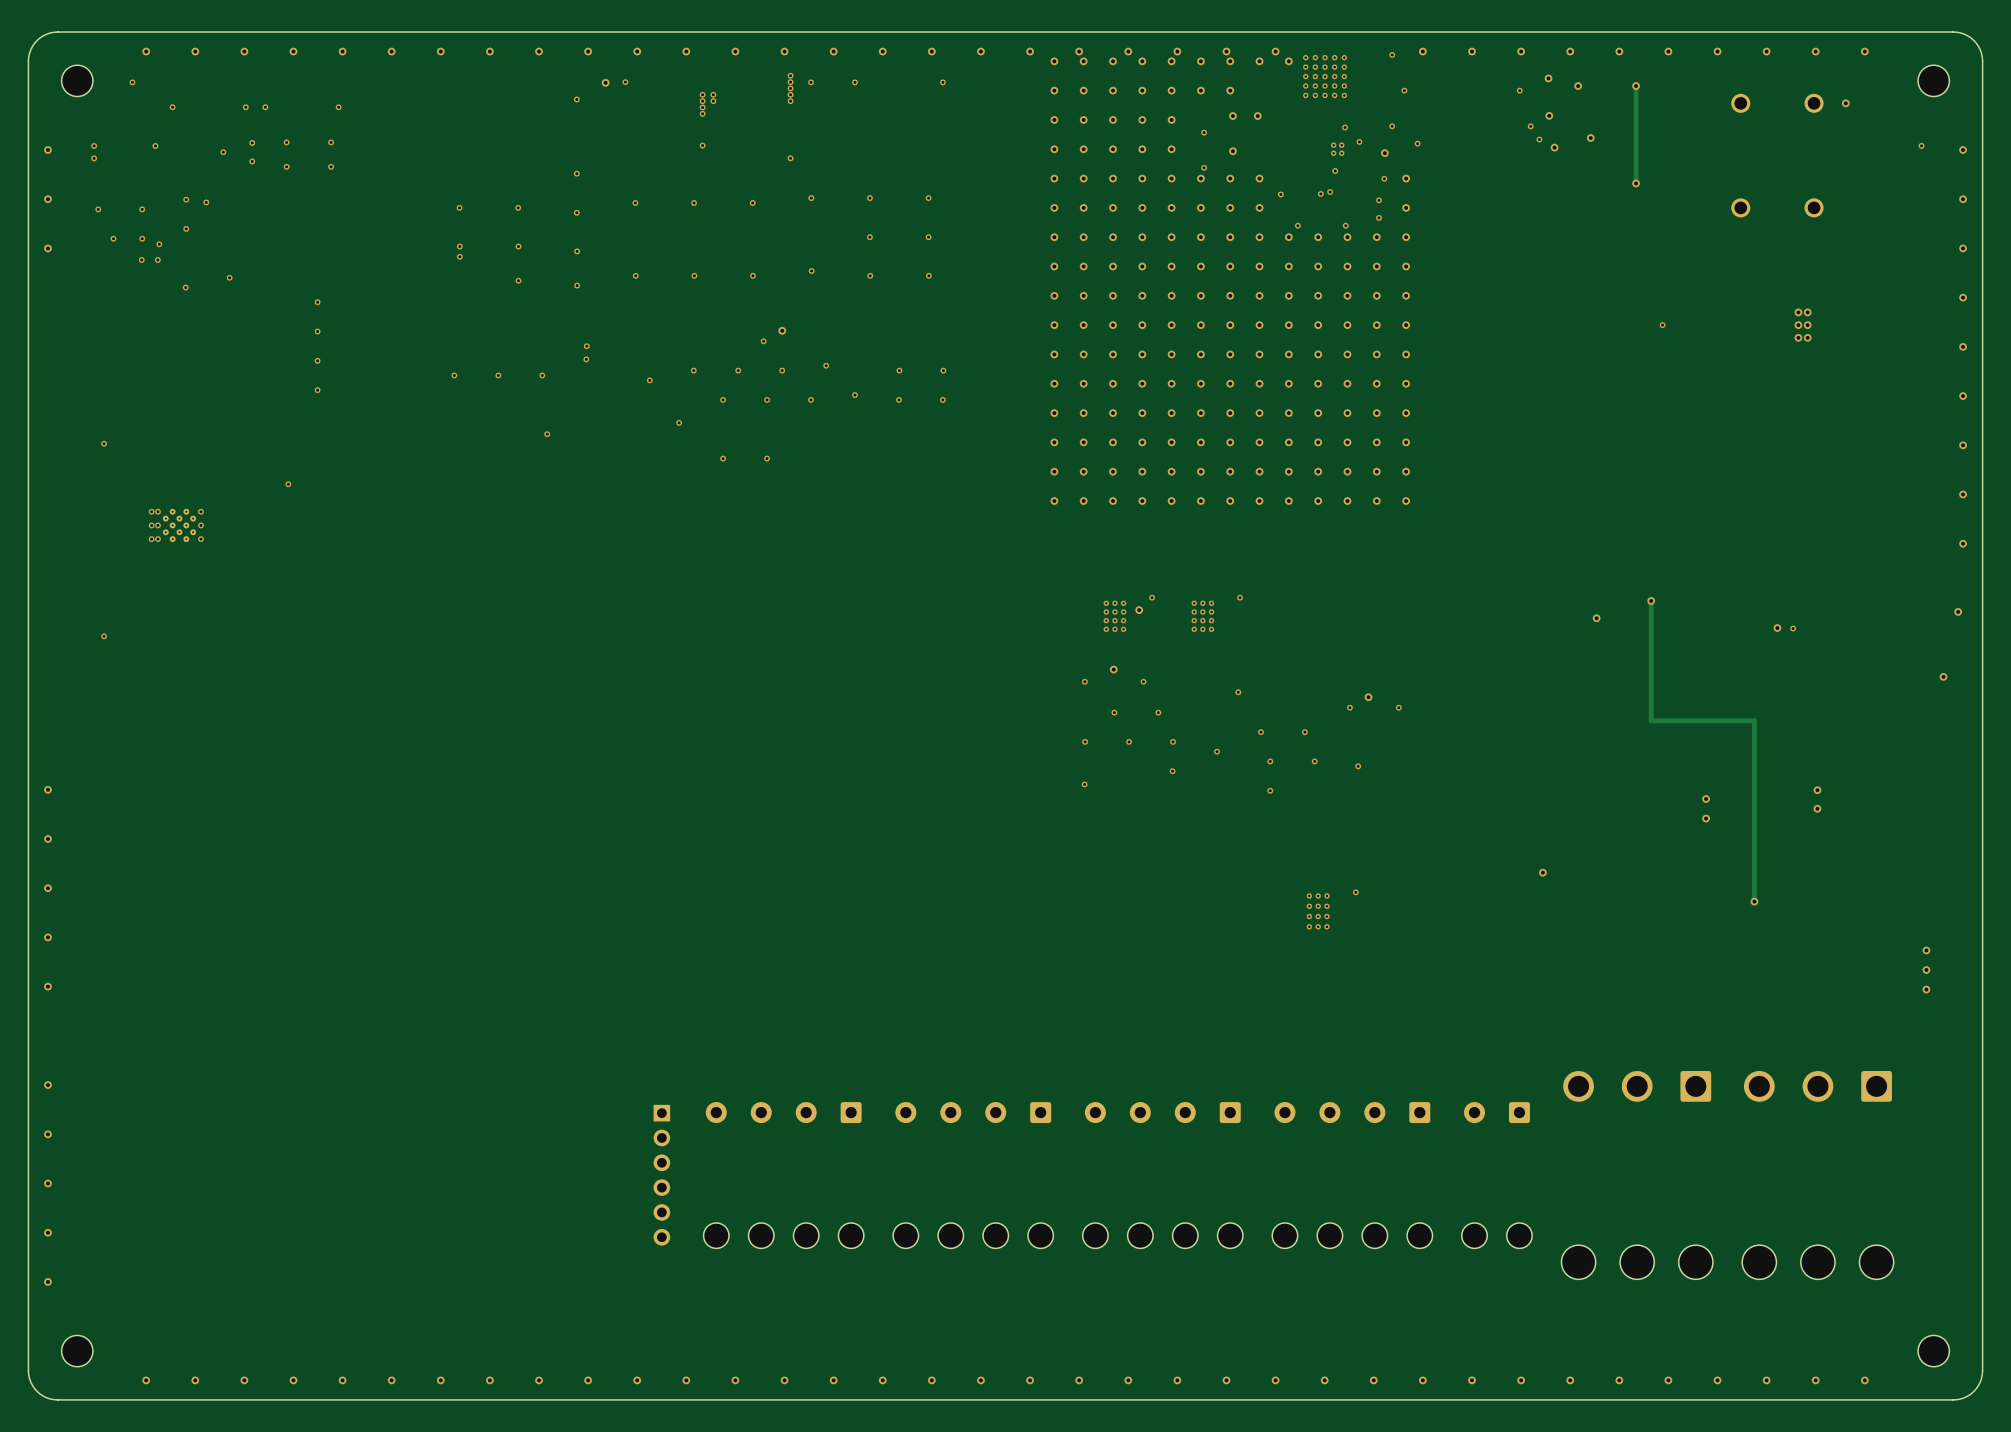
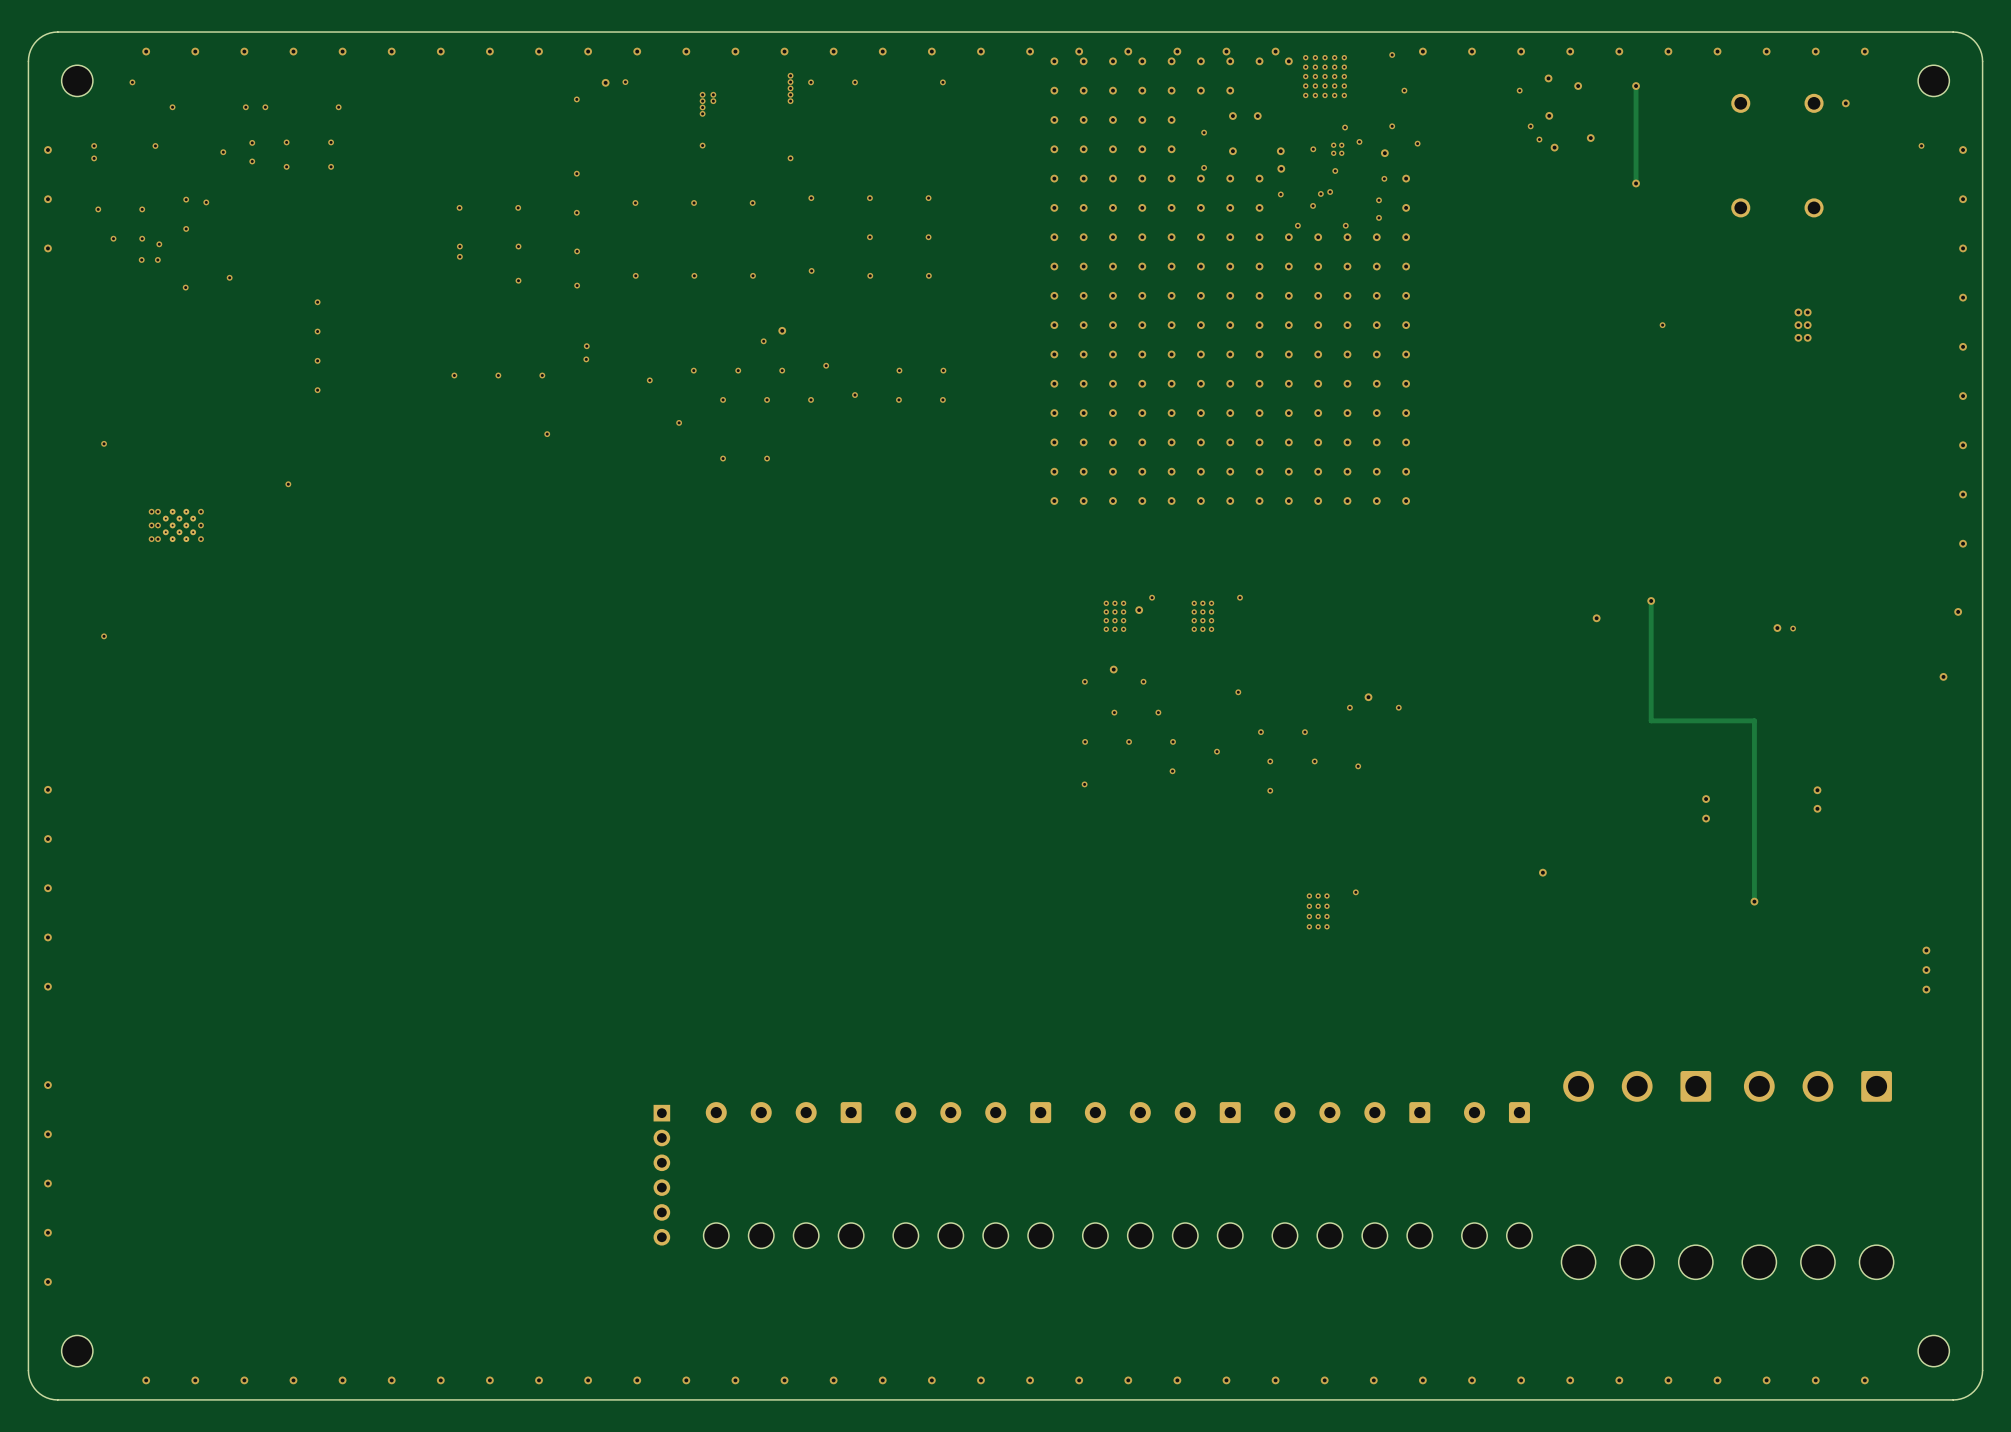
via: none -> (1313, 149)
via: none -> (1280, 151)
via: none -> (1281, 168)
via: none -> (1313, 205)

